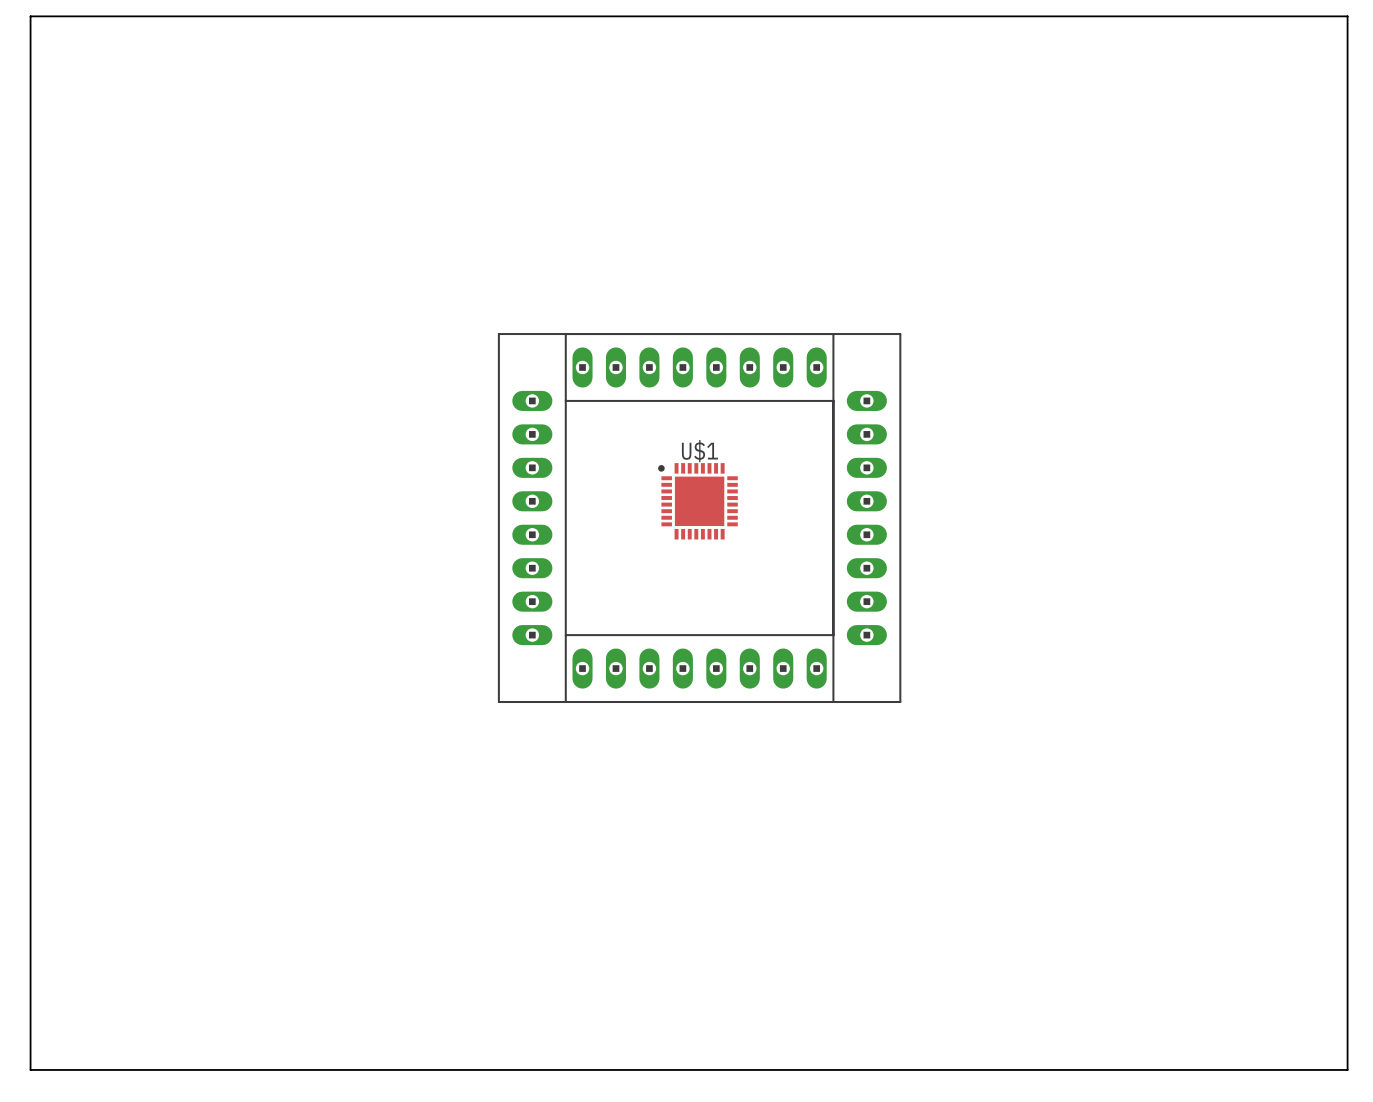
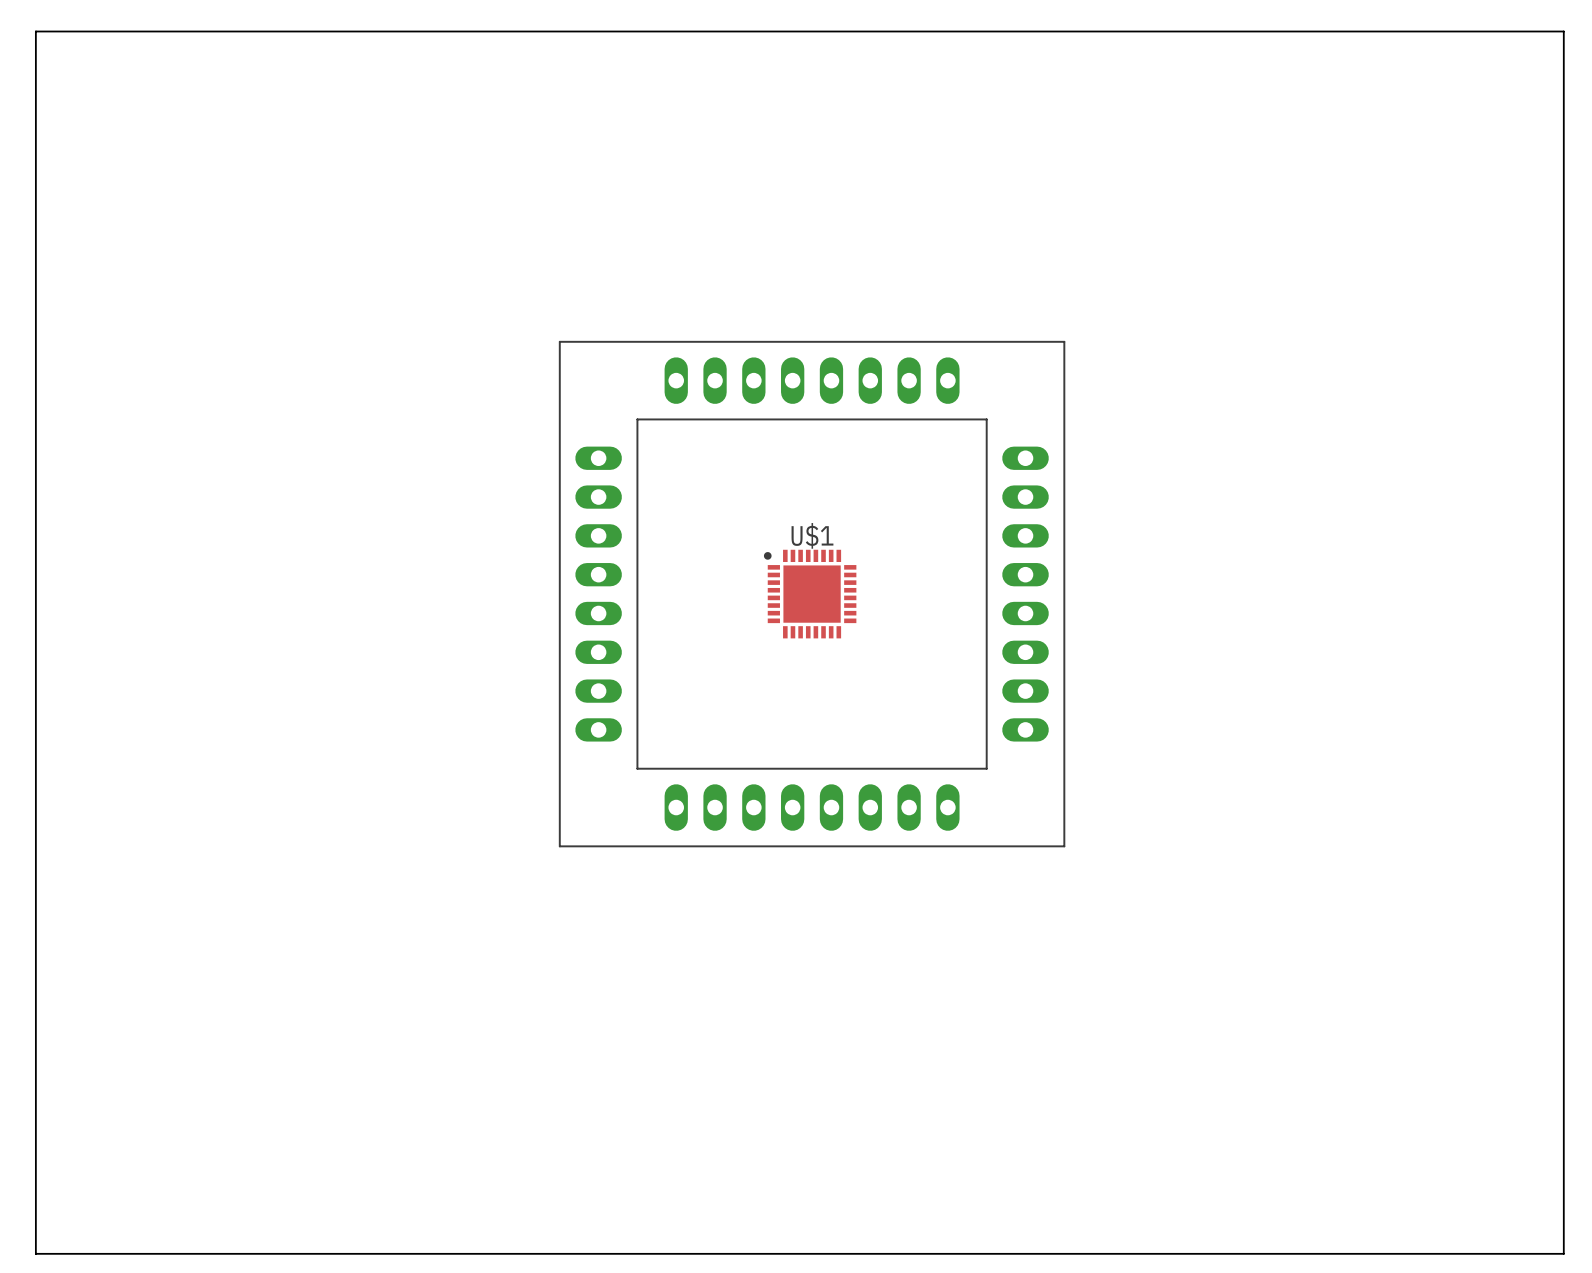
part: none -> (812, 594)
part: (699, 518) -> none

